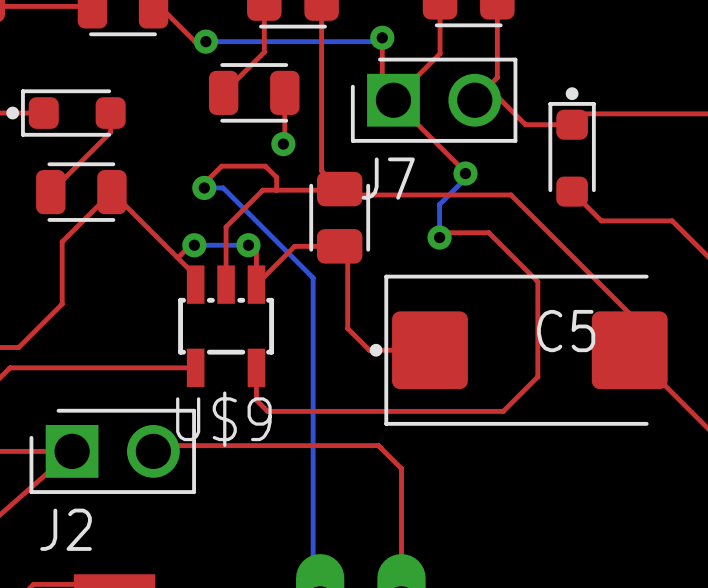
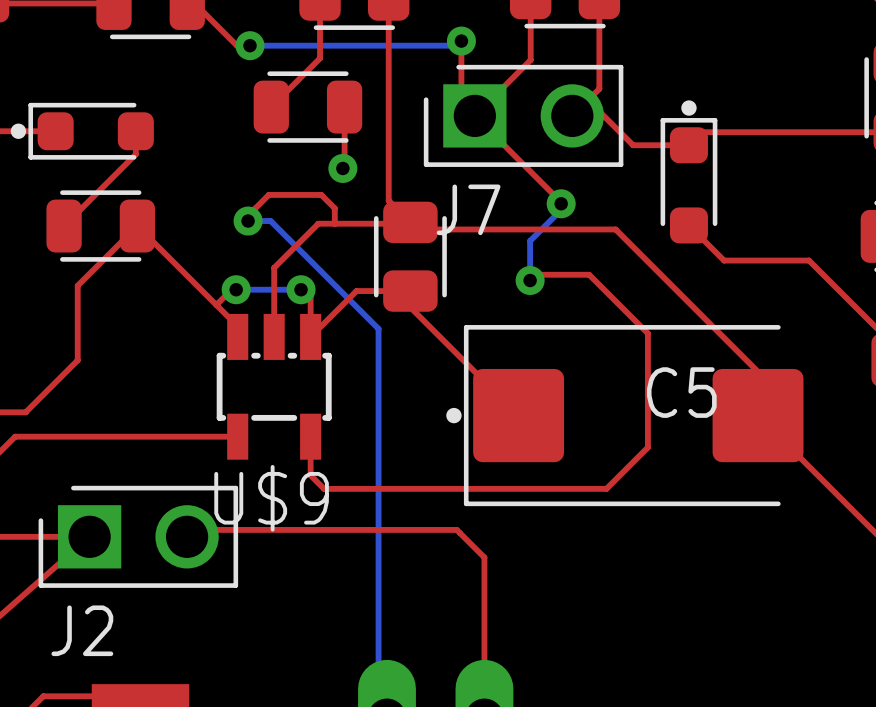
top track: (339, 246) (347, 254) (347, 328) (369, 350) (429, 350) -> (410, 291) (410, 307) (518, 415)

